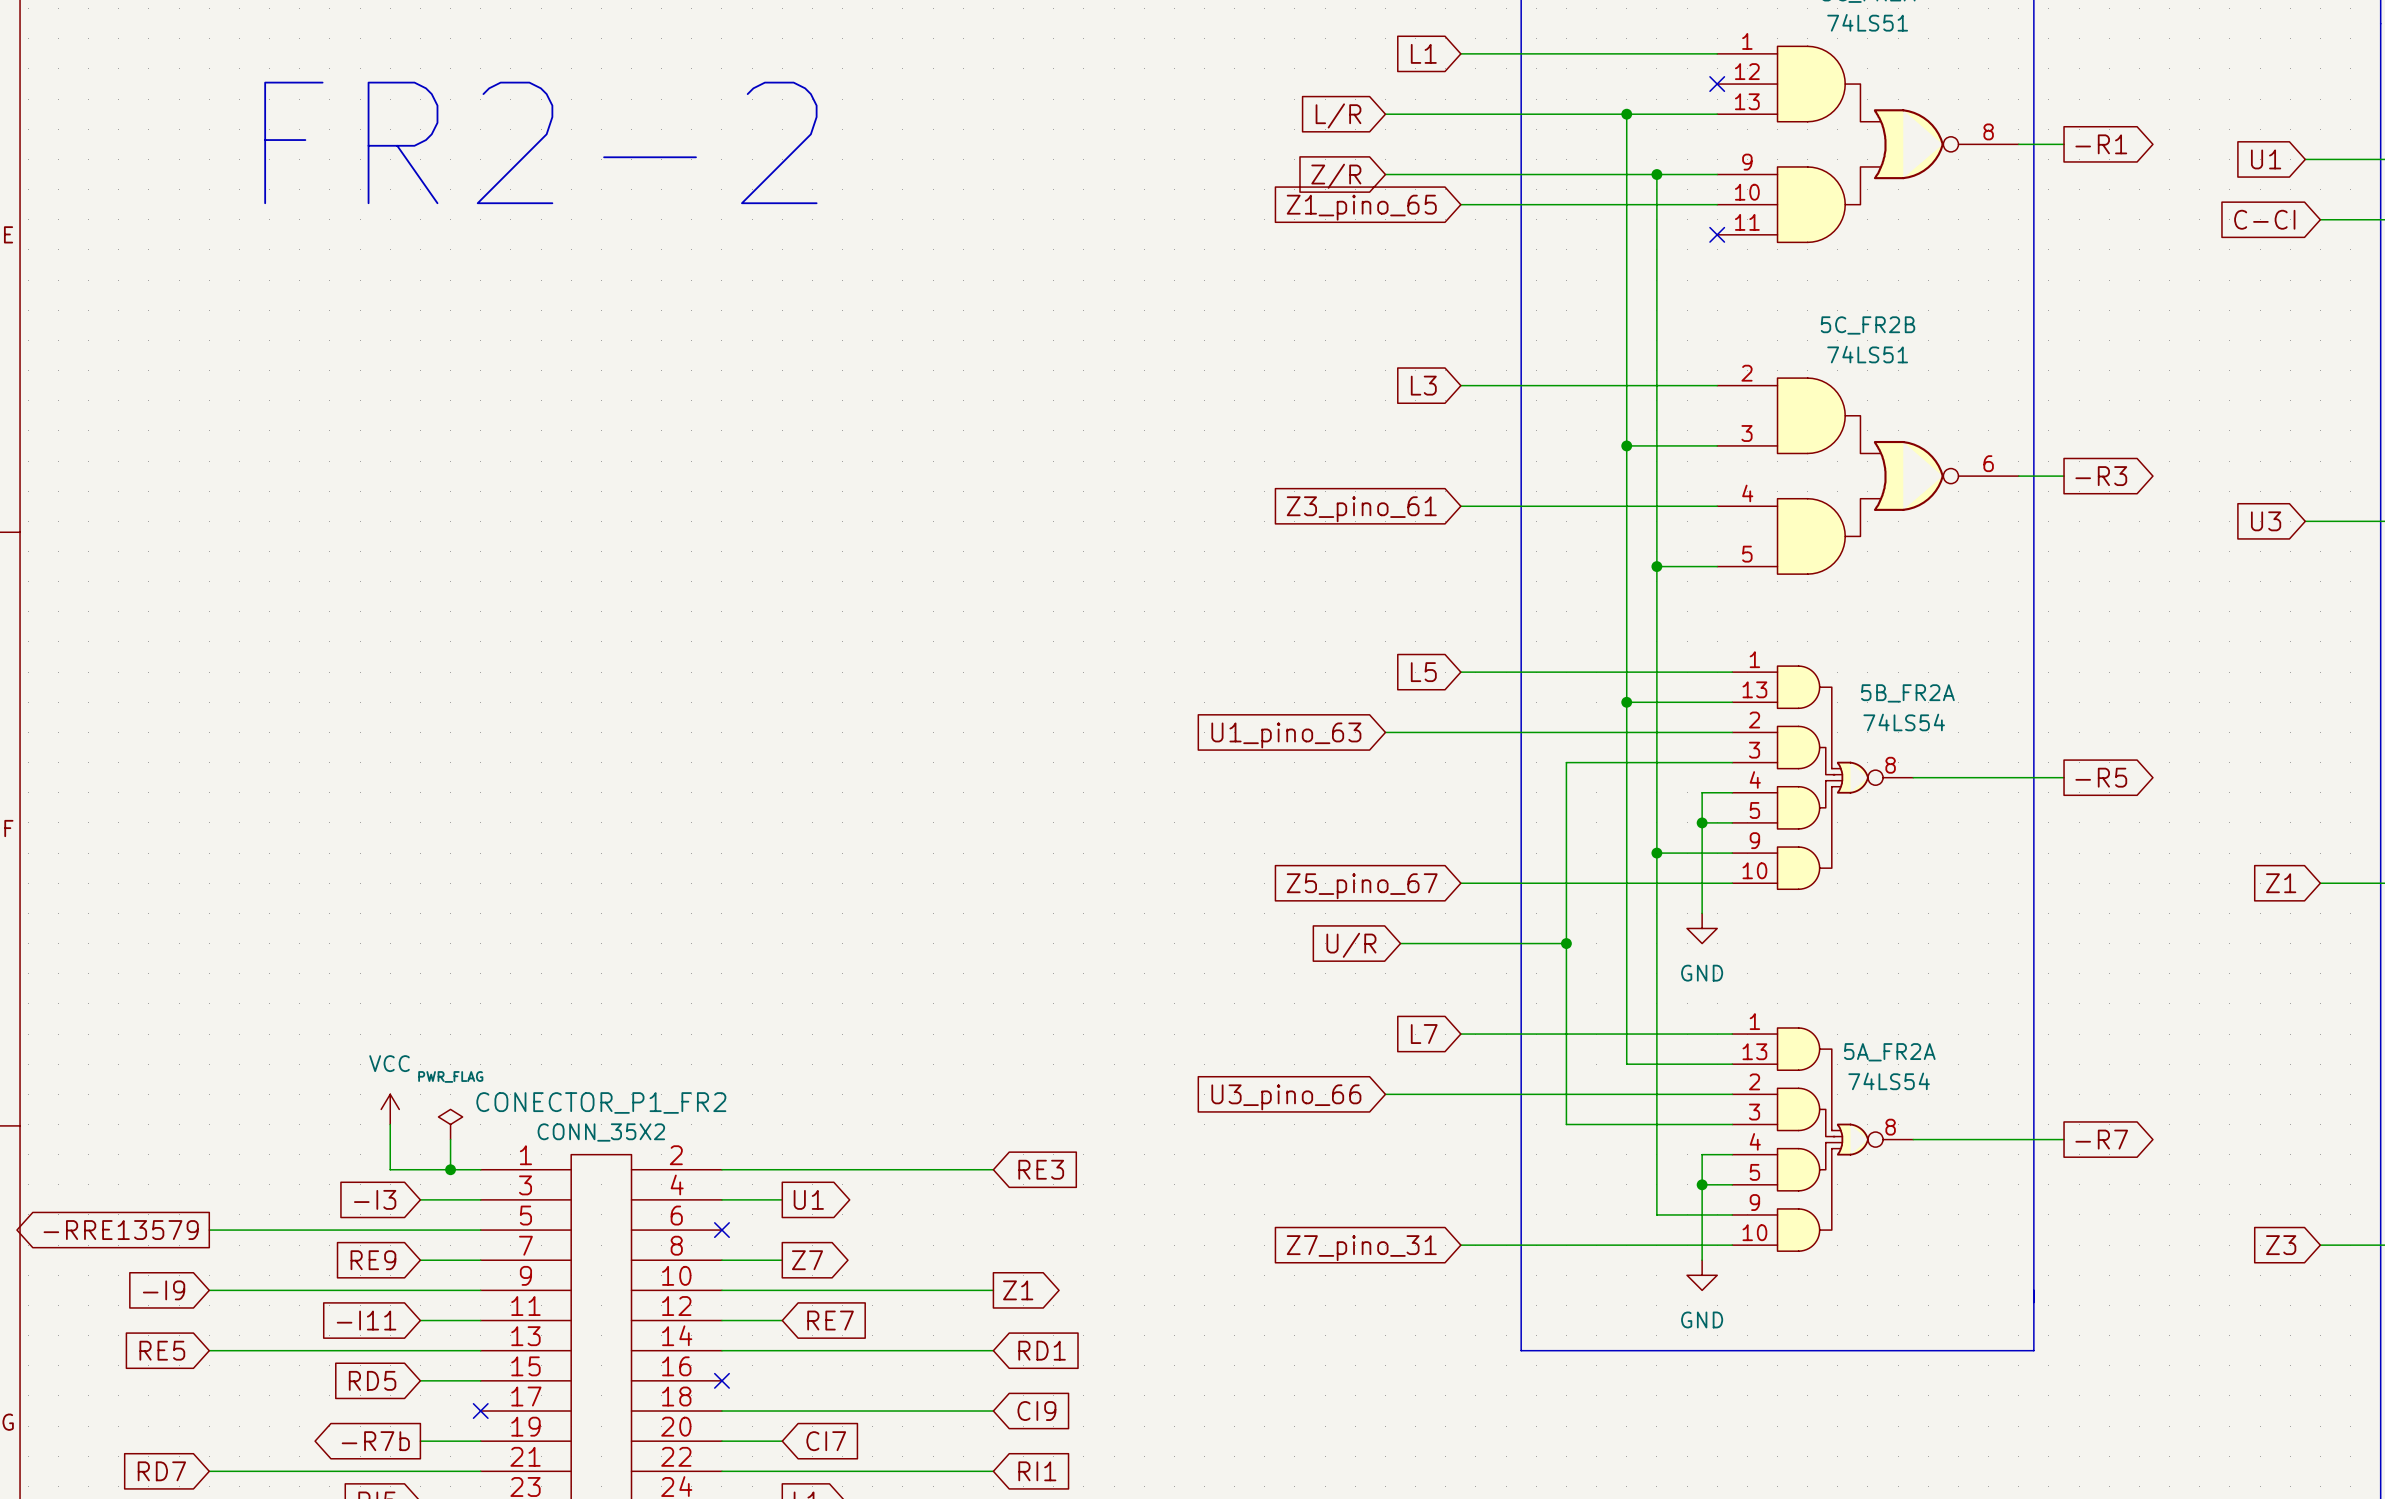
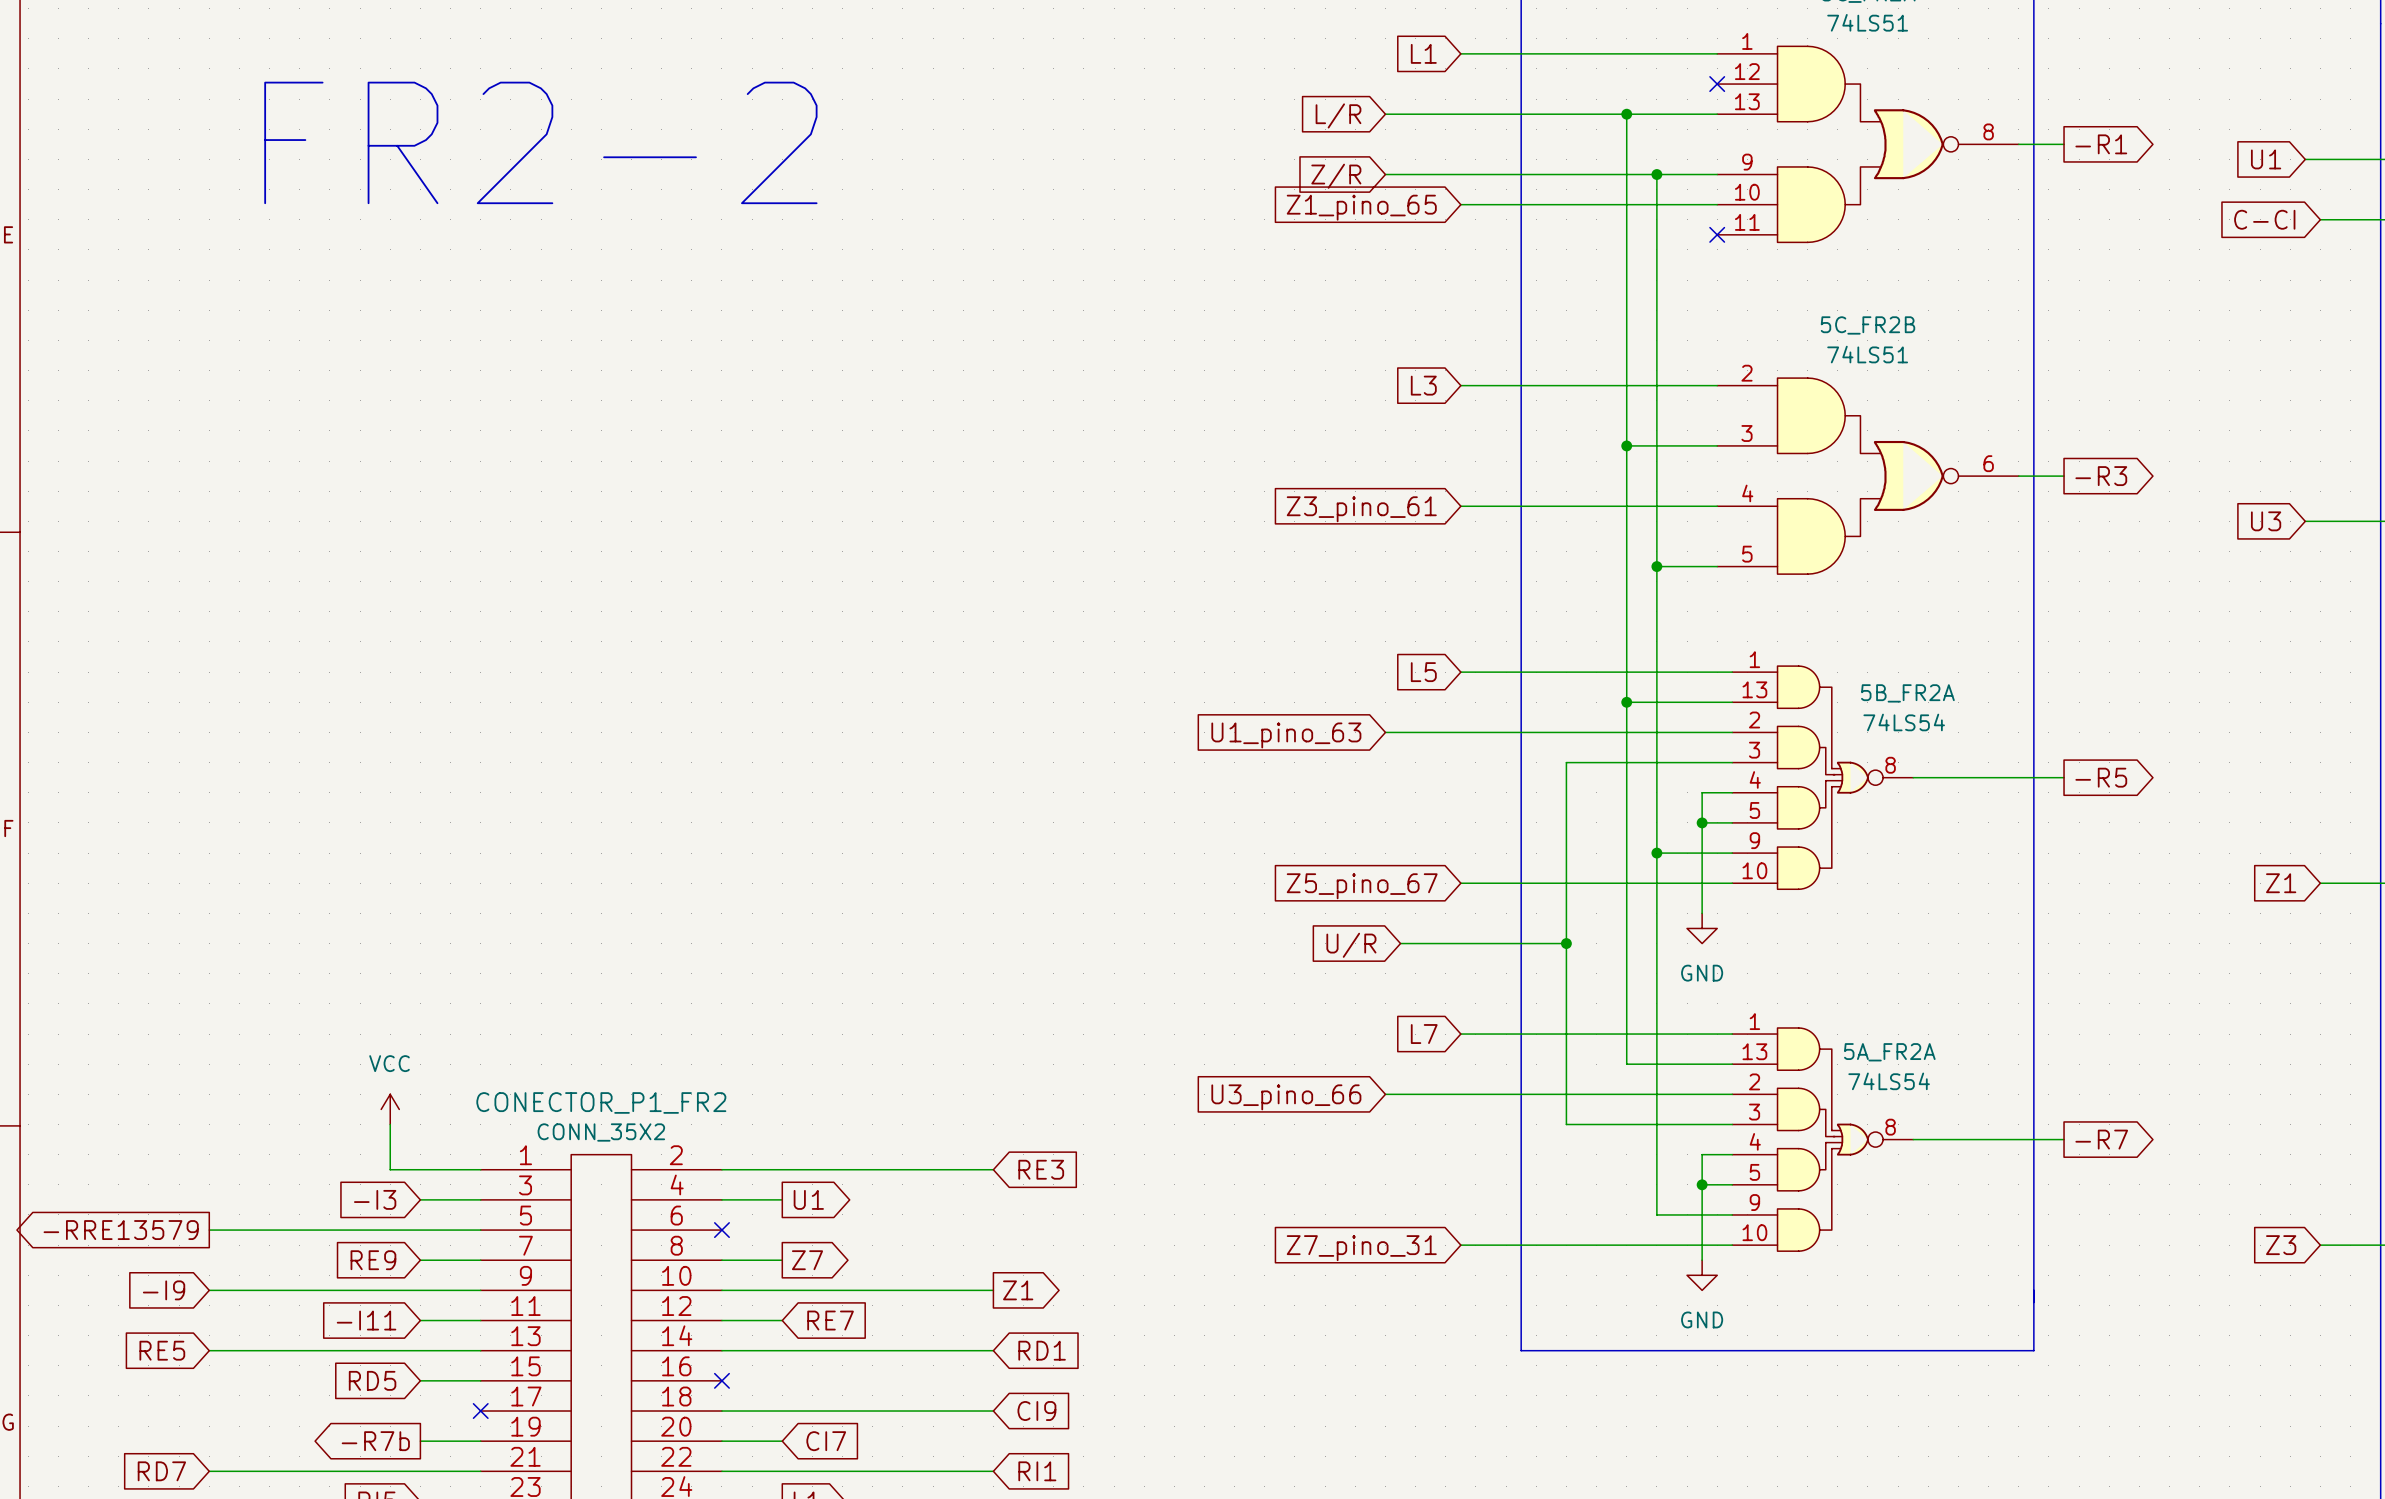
power symbol: PWR_FLAG (450, 1124) -> none
wire: (450, 1139) (450, 1169) -> none
junction: (450, 1169) -> none

